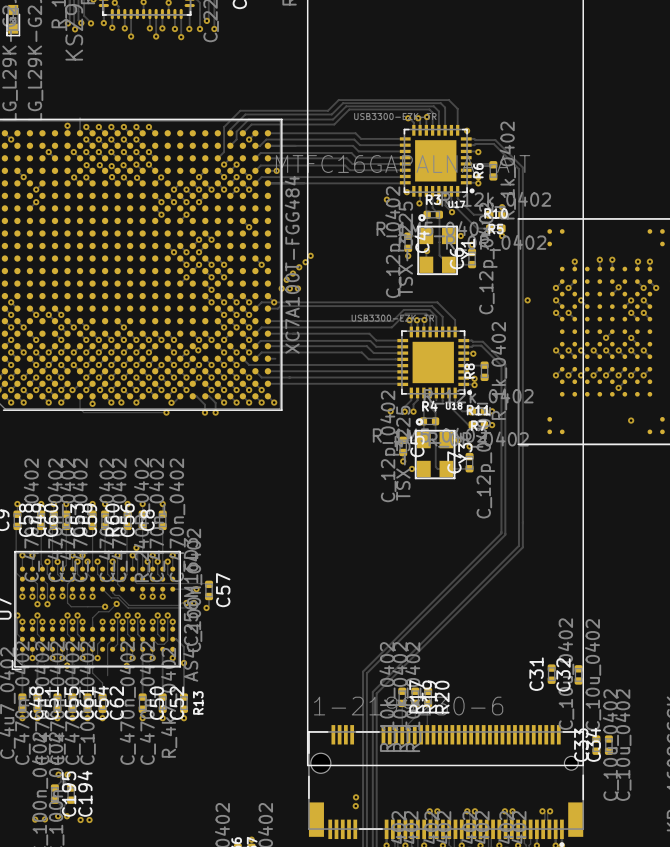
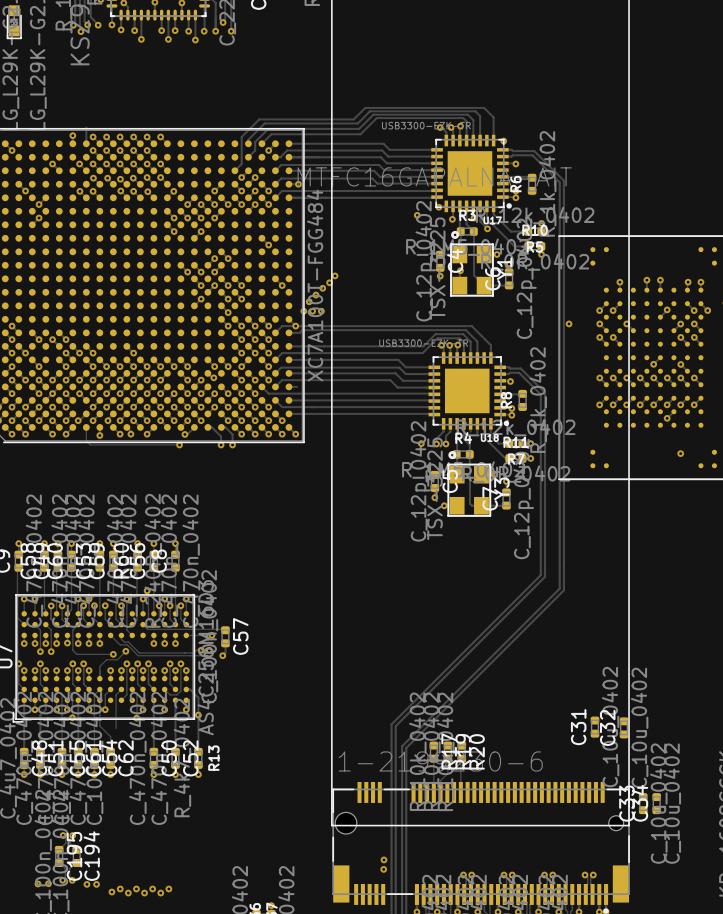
via: none -> (120, 888)
via: none -> (136, 888)
via: none -> (152, 888)
via: none -> (168, 888)
via: none -> (111, 892)
via: none -> (128, 893)
via: none -> (144, 893)
via: none -> (160, 893)

